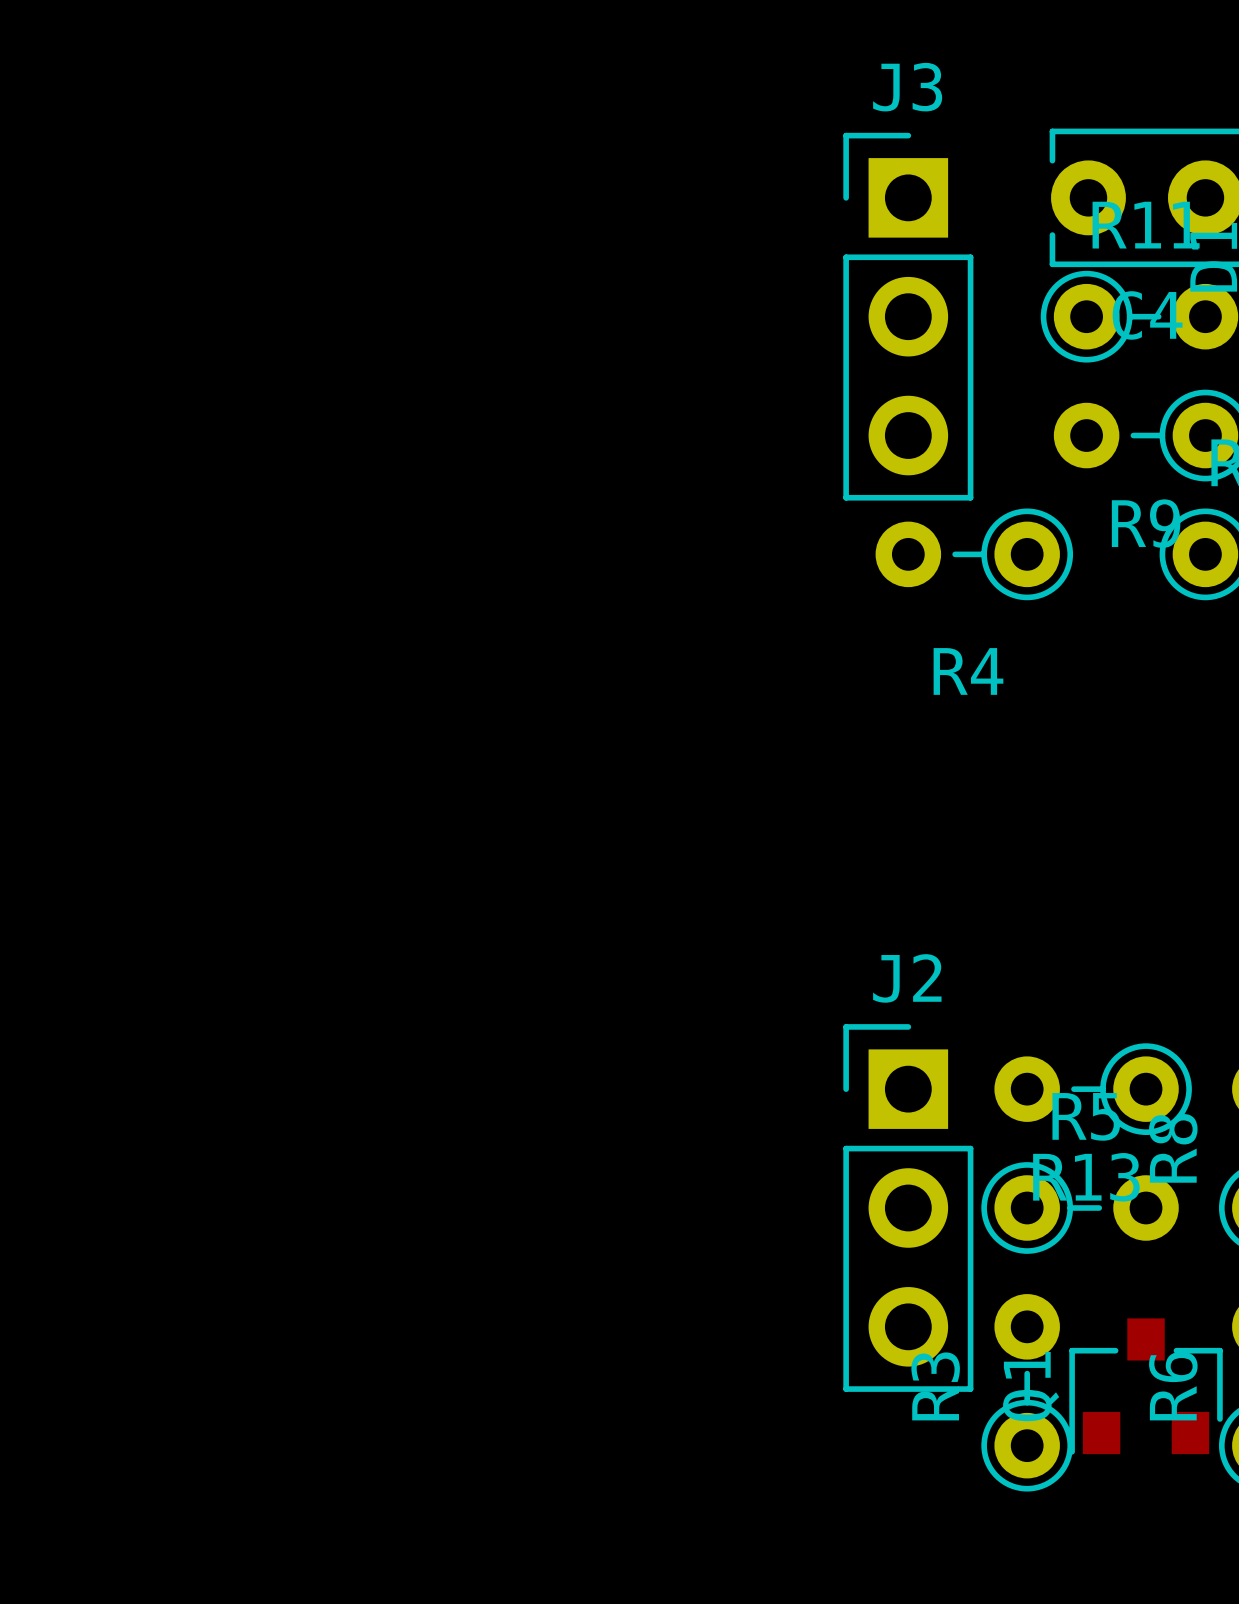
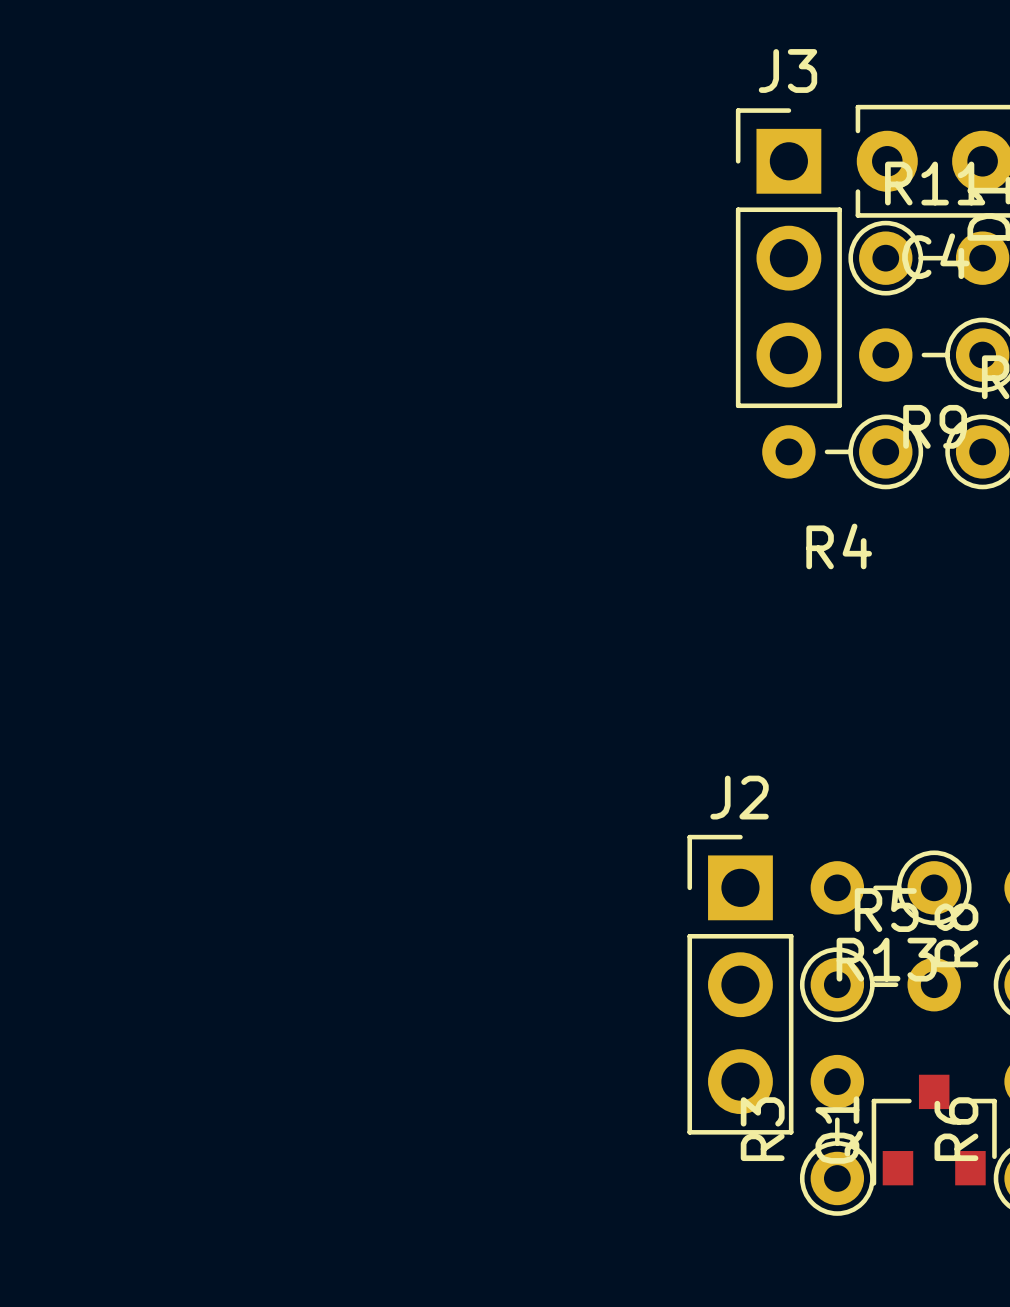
J3 position: (908, 316) -> (788, 258)
R4 position: (974, 554) -> (842, 451)

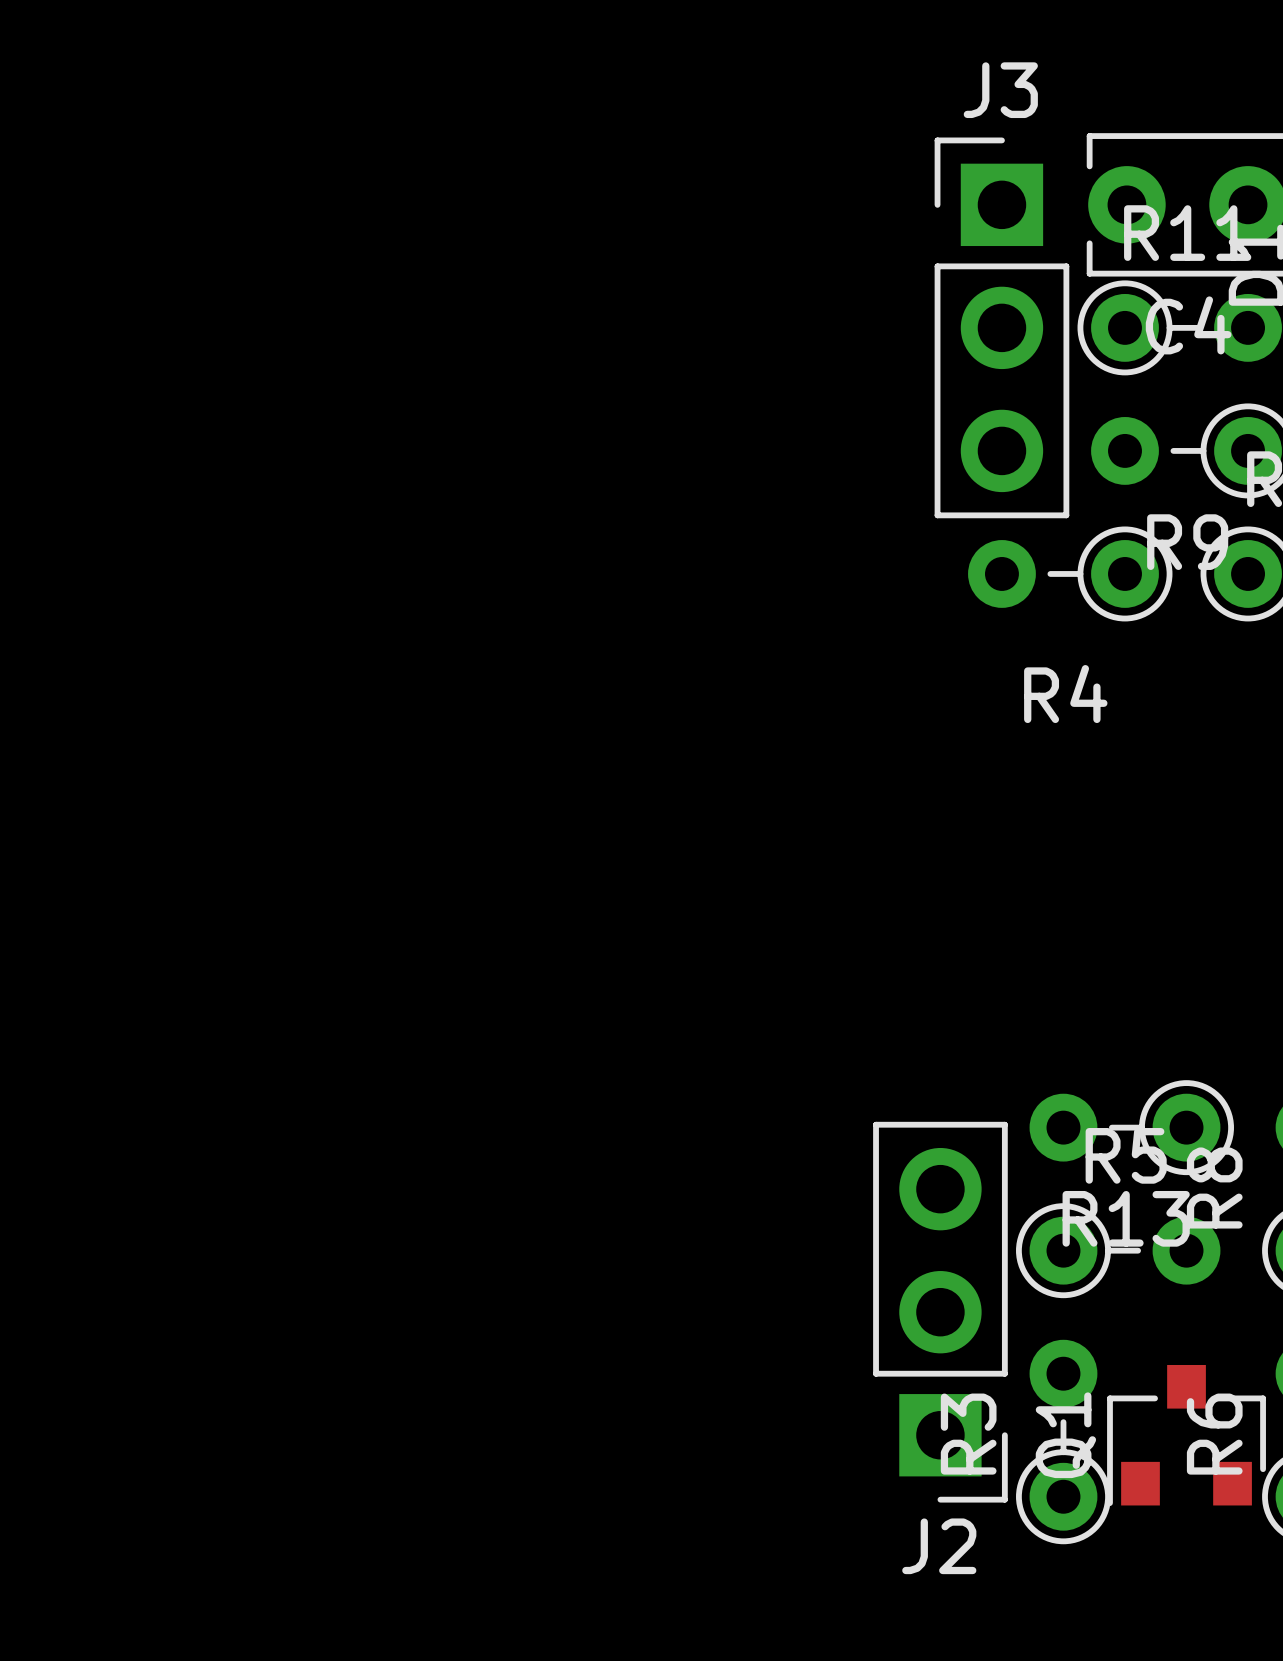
J2 rotation: 0° (740, 984) -> 180° (940, 1312)

